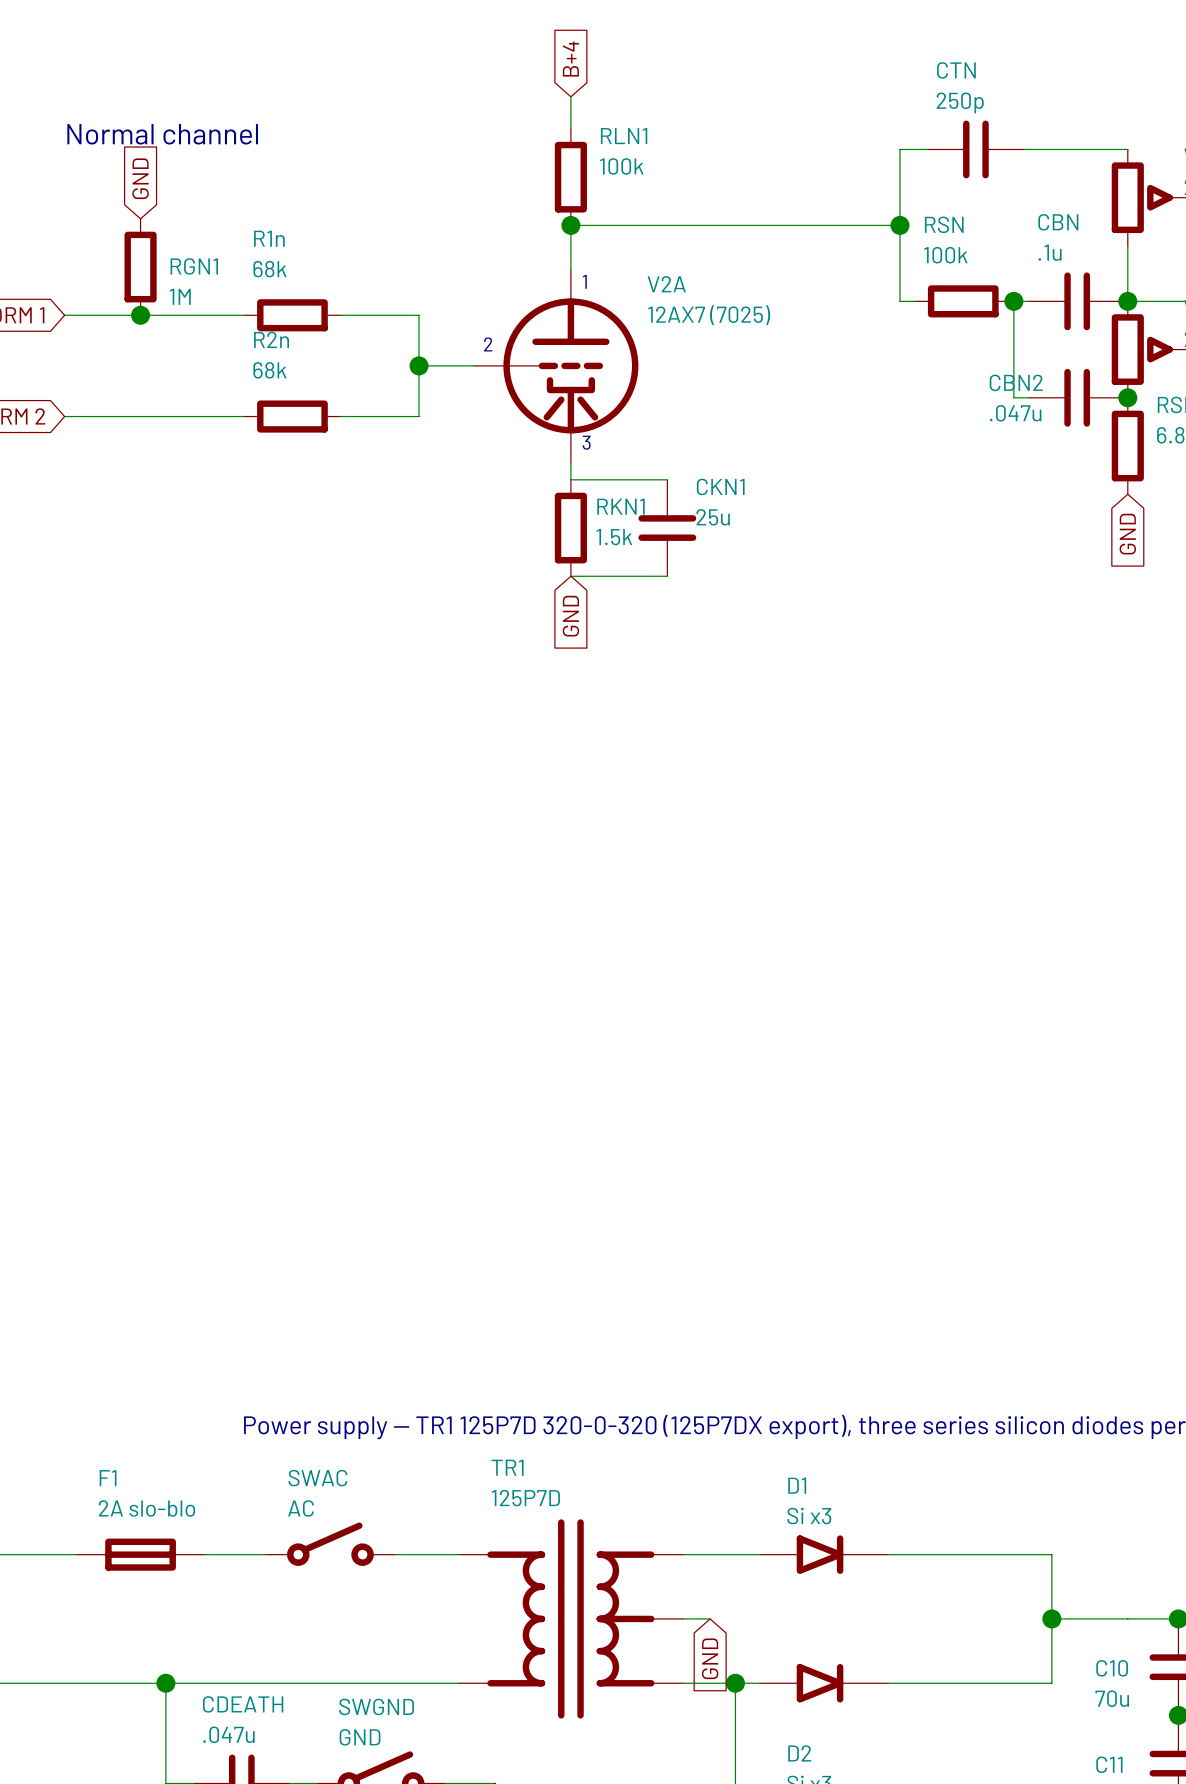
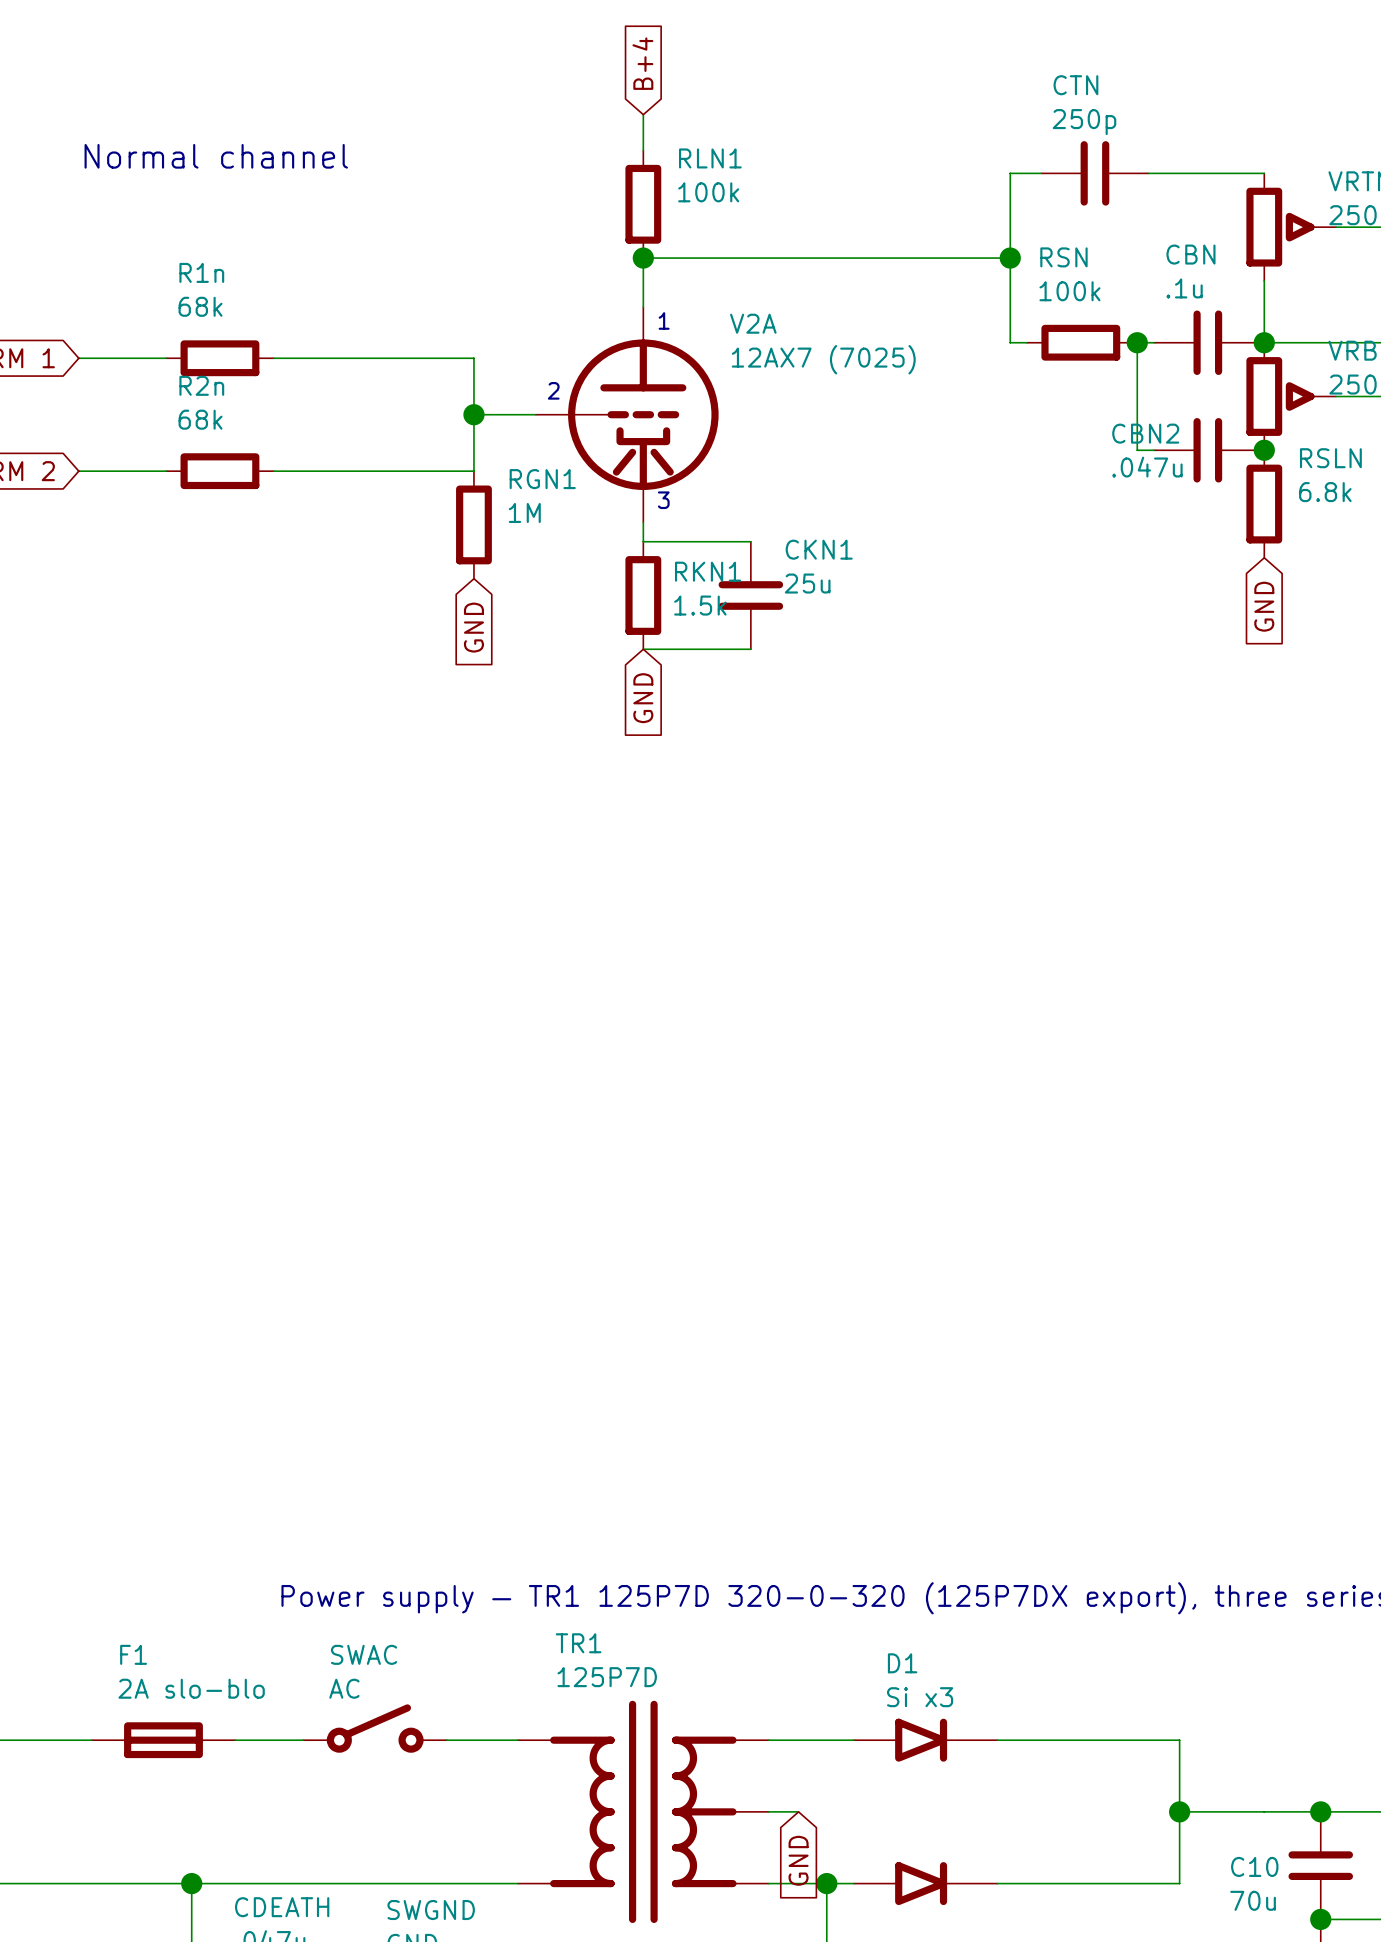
global label: GND (140, 178) -> none
RGN1 name position: RGN1 (194, 266) -> RGN1 (542, 479)
RGN1 position: (140, 267) -> (473, 524)
RGN1 value position: 1M (180, 296) -> 1M (524, 512)
junction: (140, 315) -> none
wire: (142, 315) (239, 315) -> (279, 358) (386, 358)
R1n position: (292, 315) -> (219, 358)
wire: (142, 416) (239, 416) -> (279, 471) (386, 471)
R2n position: (292, 416) -> (219, 471)
global label: none -> GND (473, 627)

